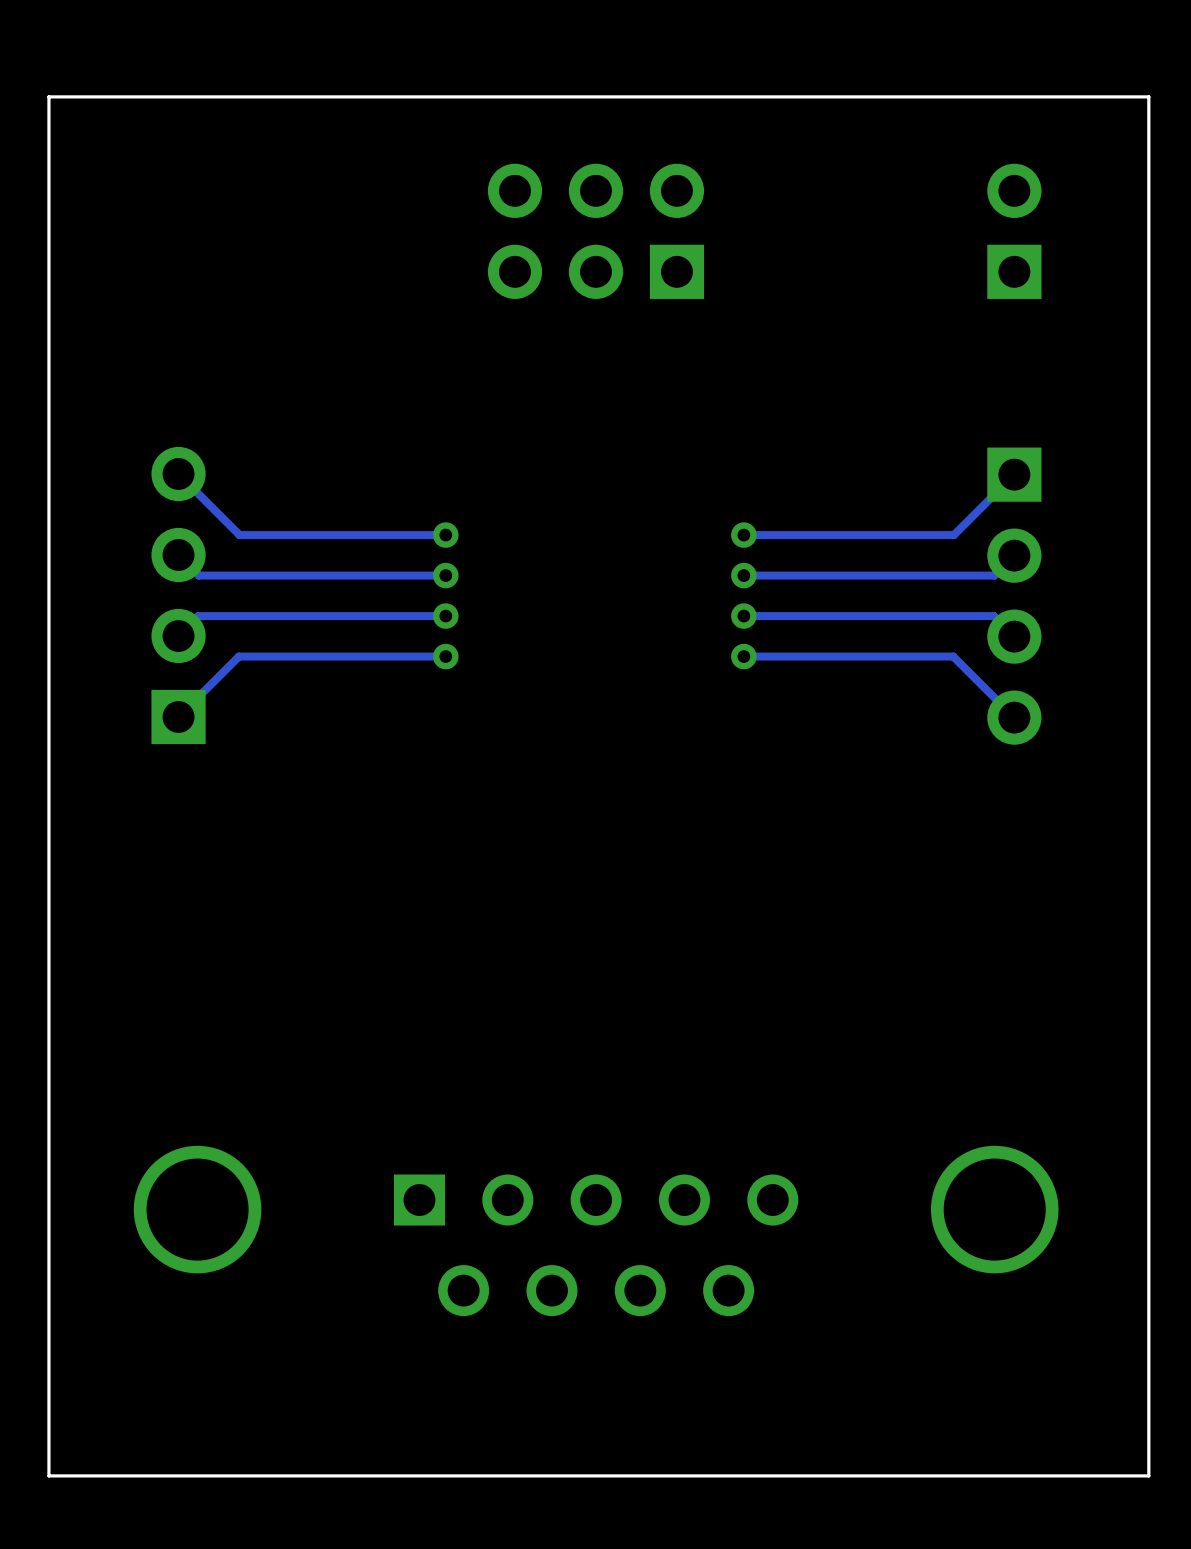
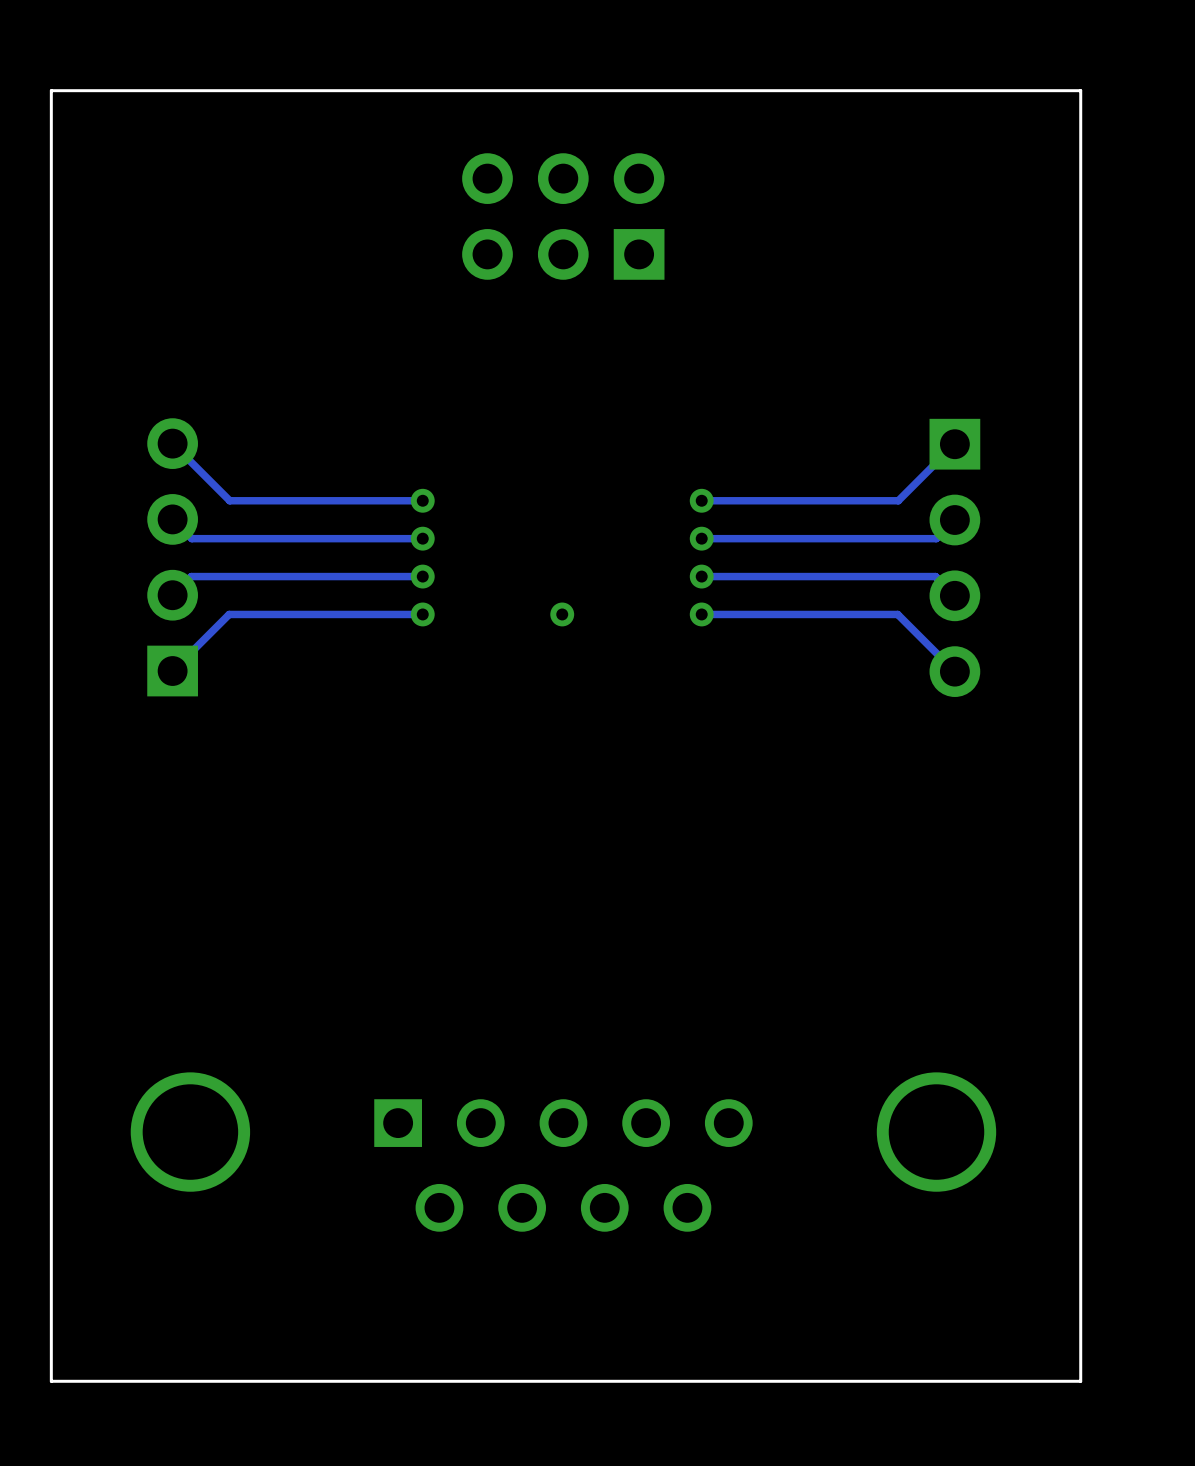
part: (1014, 231) -> none
via: none -> (562, 614)

